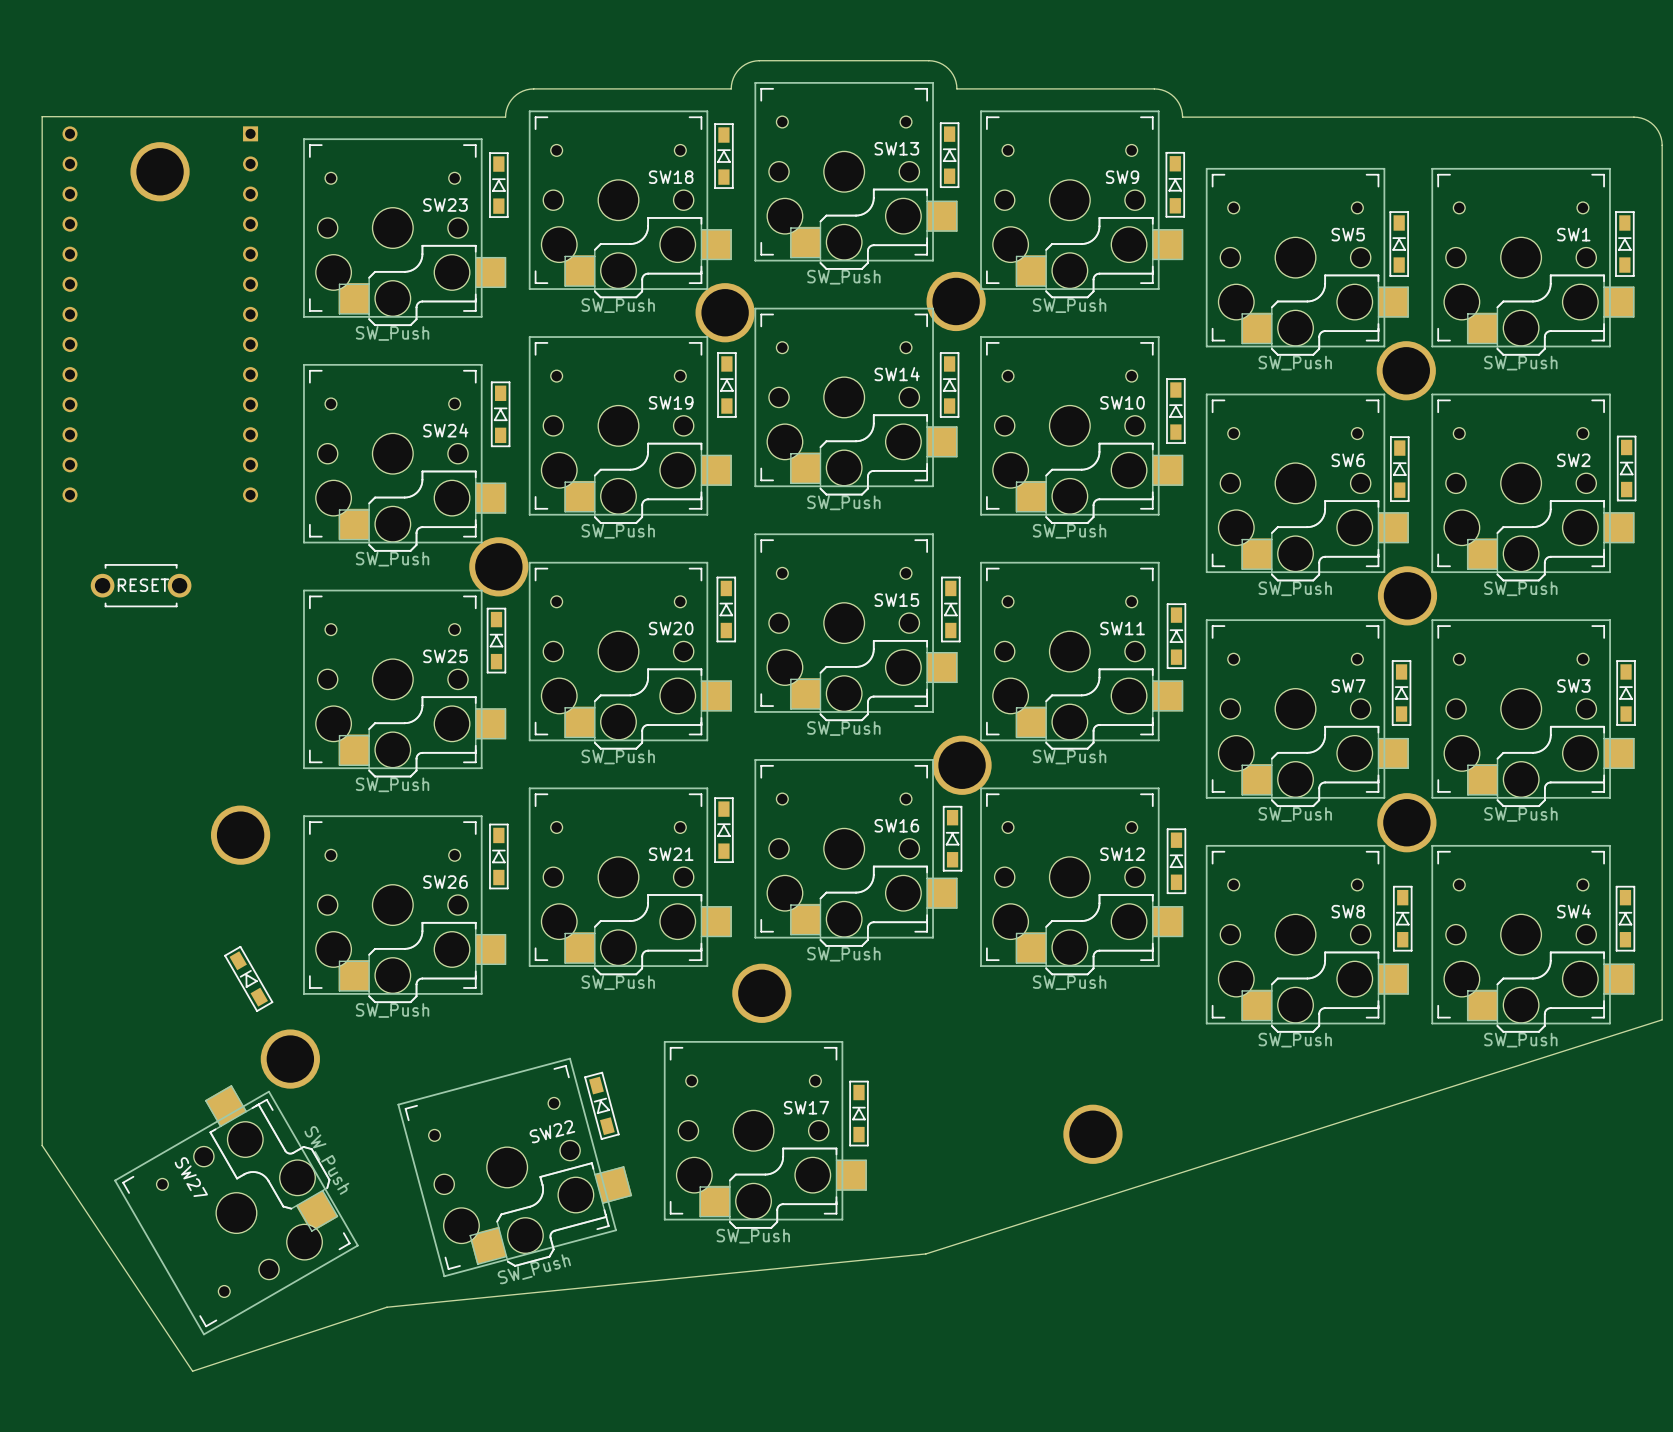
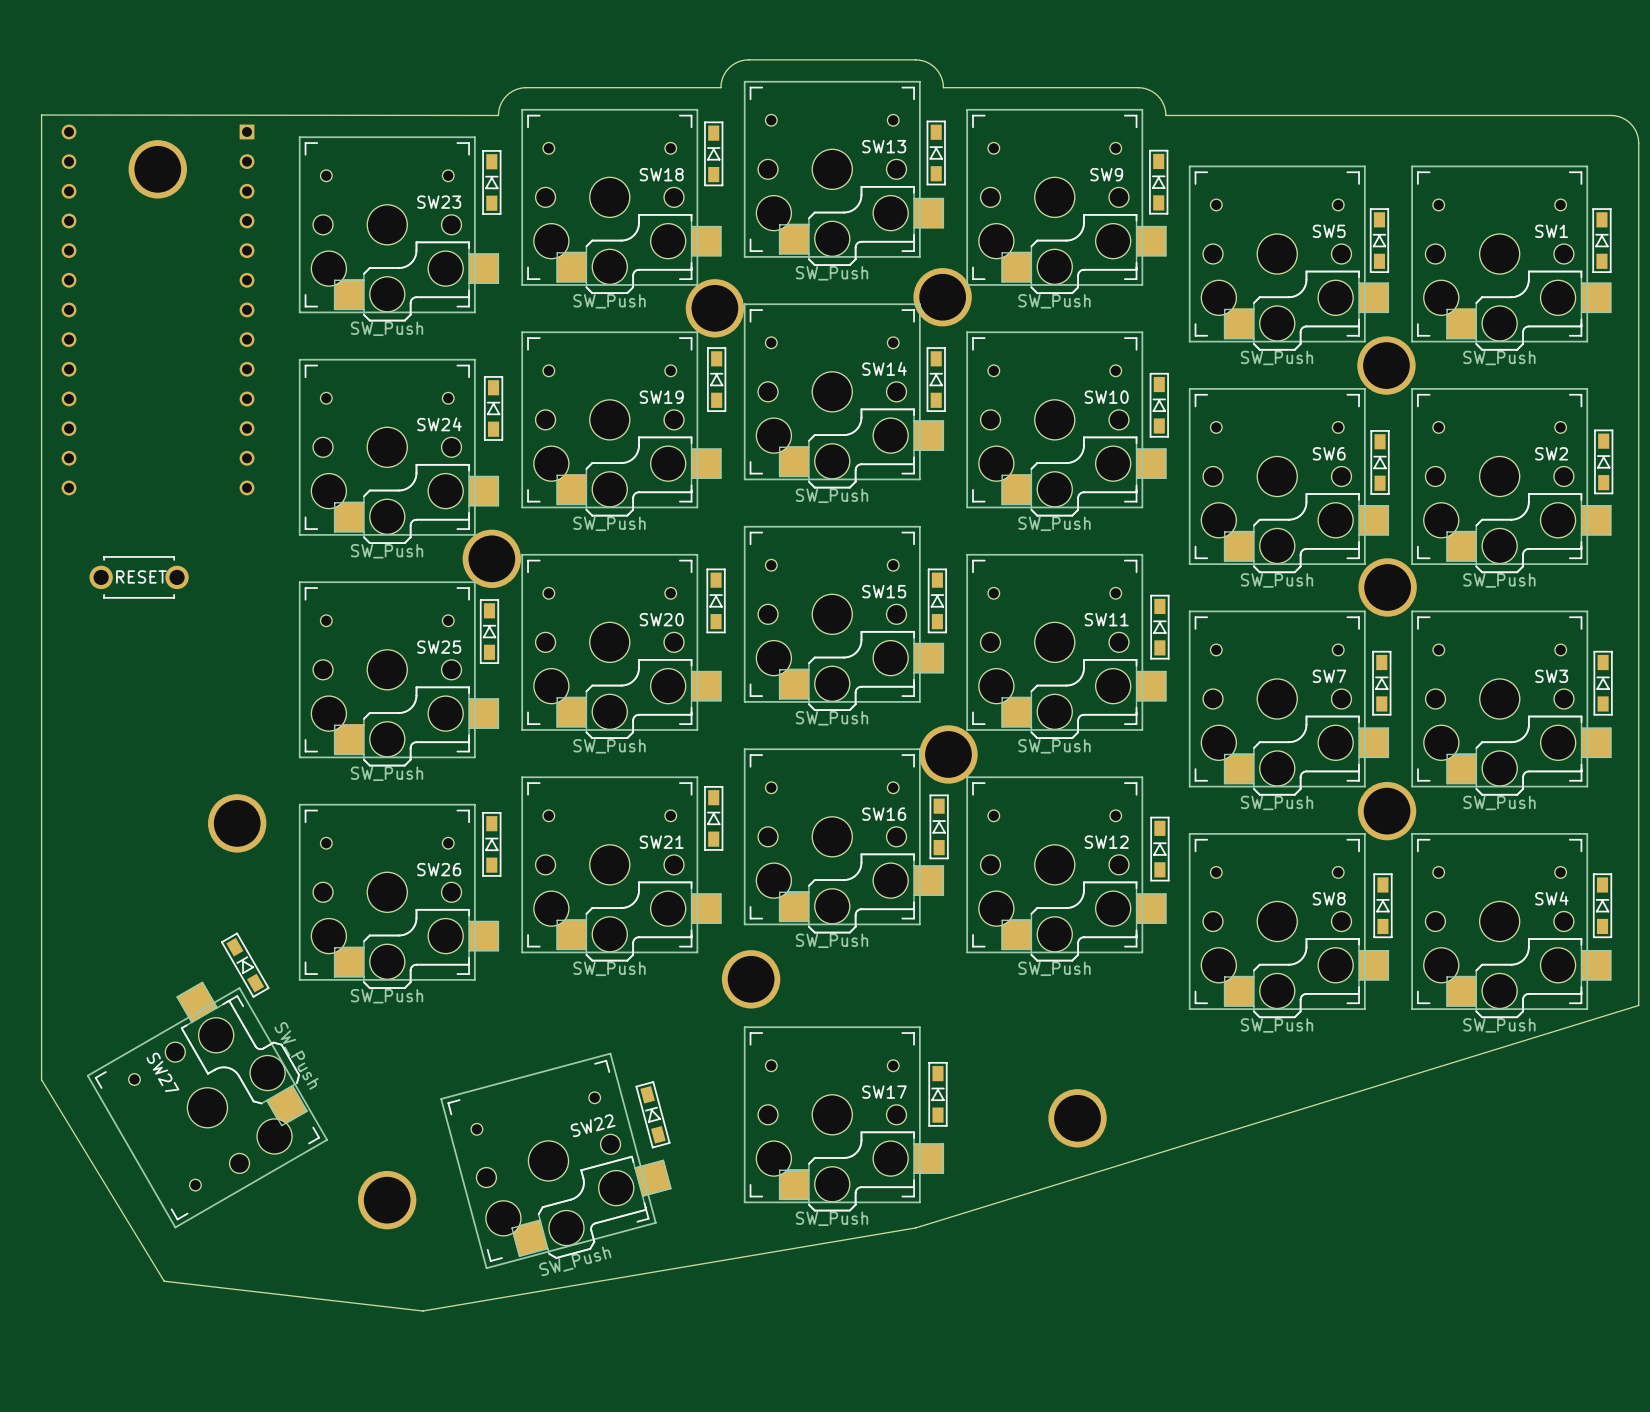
board edge: (1662, 1019) (925, 1253) (386, 1307) (192, 1371) (42, 1145) (42, 1095) -> (1638, 1005) (915, 1227) (422, 1311) (164, 1281) (41, 1079)
part position: (290, 1059) -> (387, 1200)
part position: (601, 1105) -> (652, 1114)
part position: (858, 1113) -> (937, 1094)
SW17 position: (765, 1134) -> (843, 1118)
SW22 position: (514, 1167) -> (556, 1160)
SW27 position: (236, 1210) -> (207, 1104)

